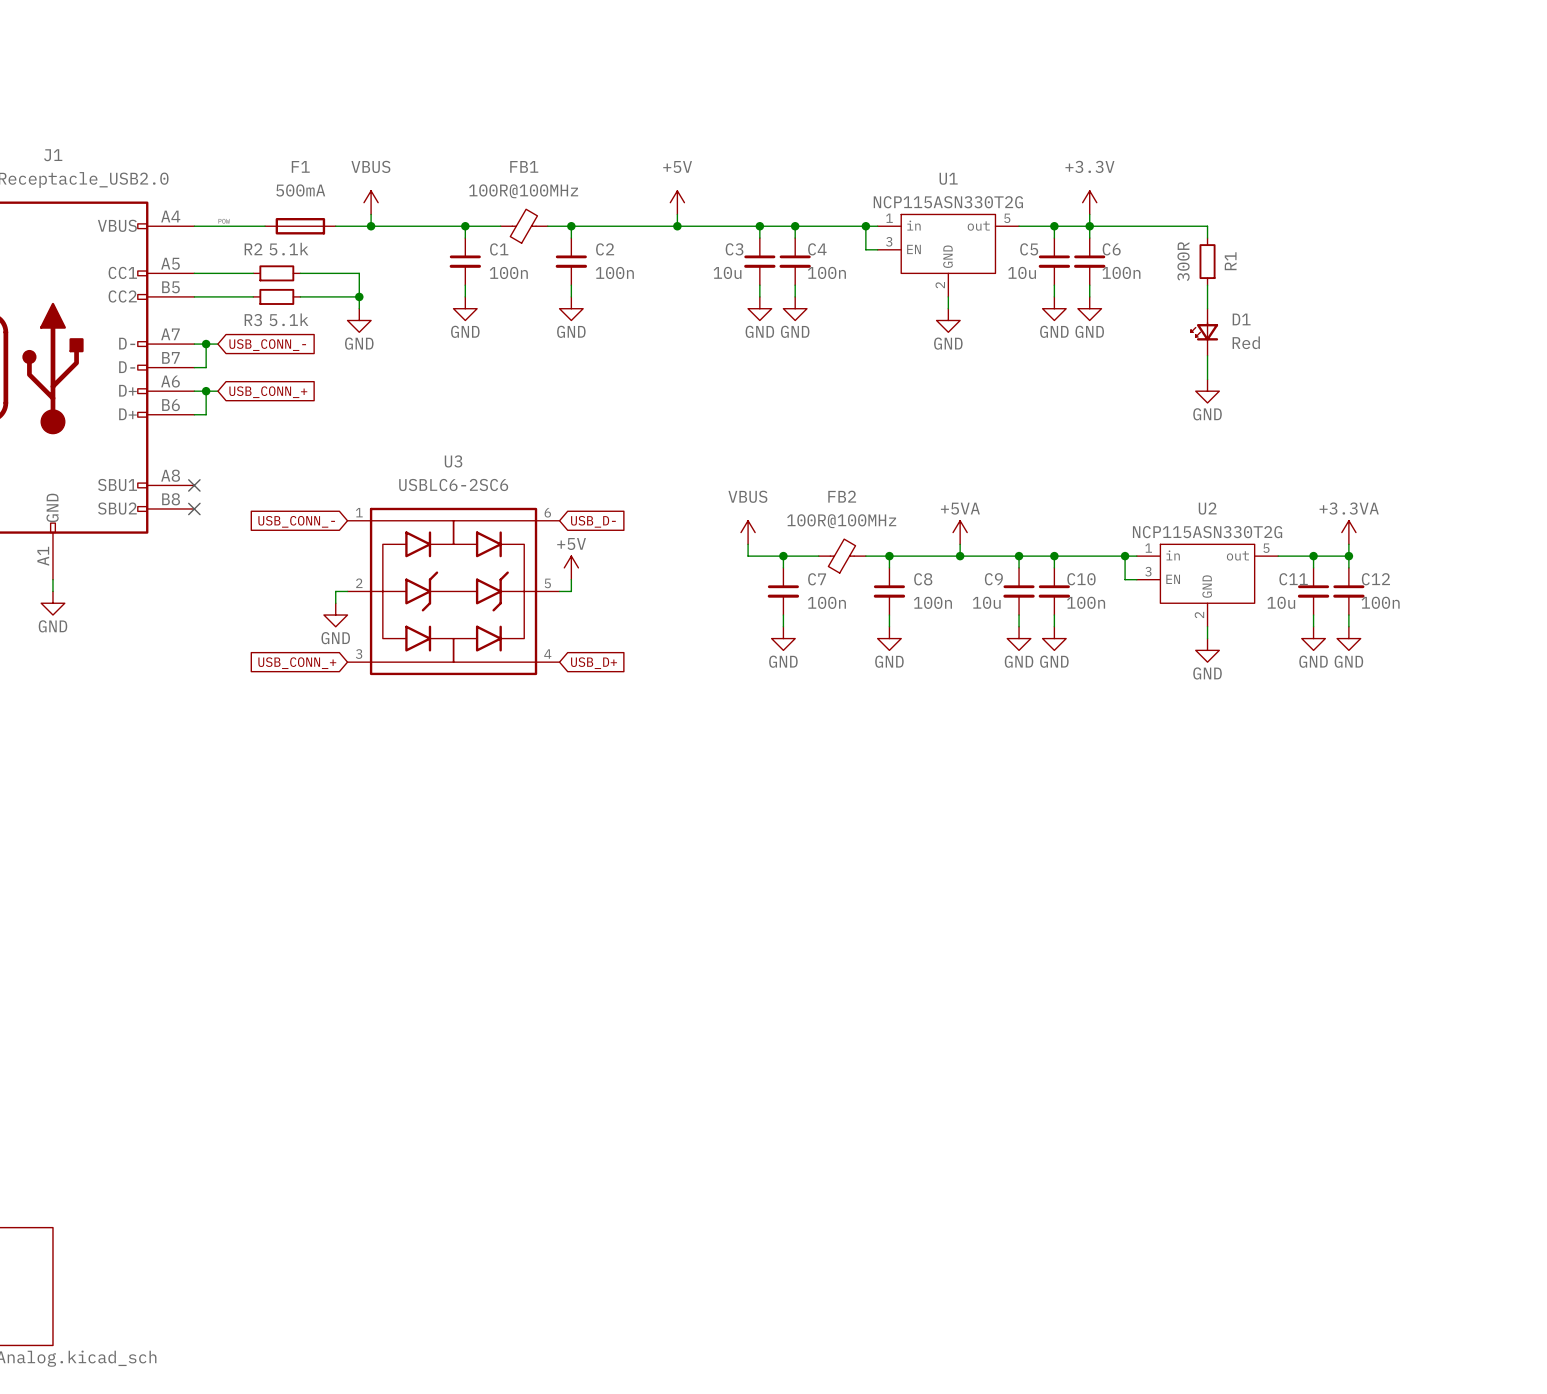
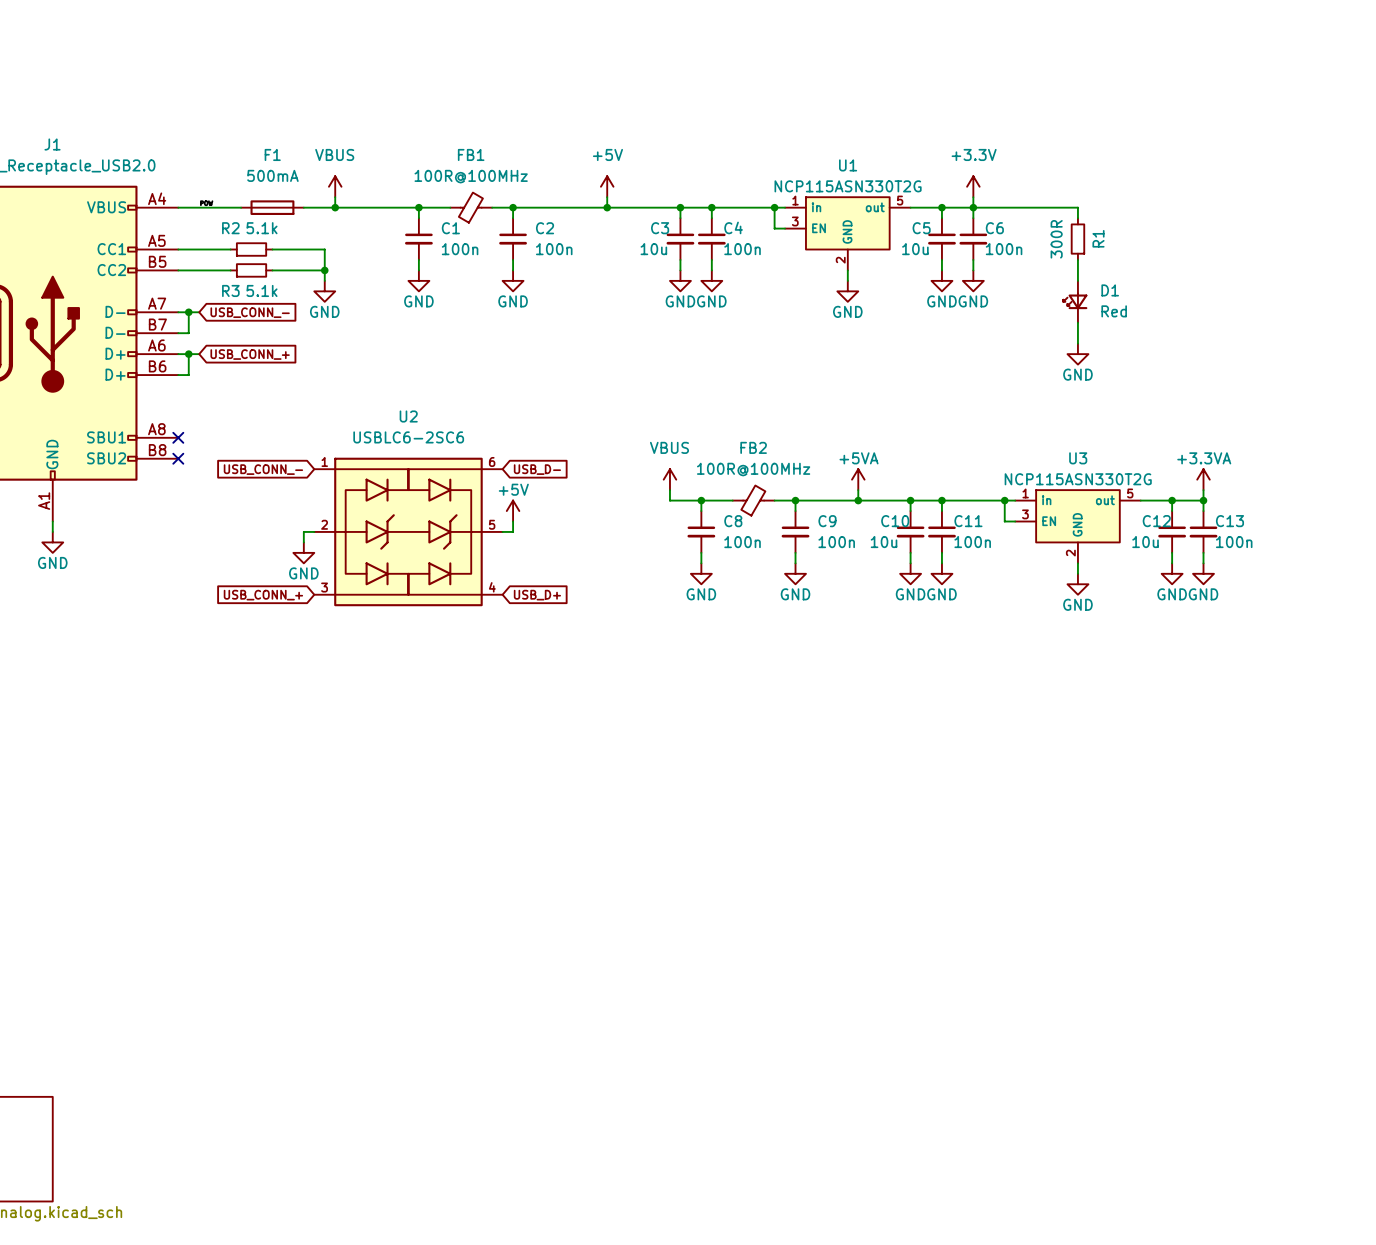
U3 name: U3 (453, 461) -> U2 (408, 416)
U2 name: U2 (1207, 508) -> U3 (1078, 458)
C7 name: C7 (817, 579) -> C8 (733, 521)
C8 name: C8 (923, 579) -> C9 (827, 521)
C9 name: C9 (993, 579) -> C10 (895, 521)
C10 name: C10 (1081, 579) -> C11 (968, 521)
C11 name: C11 (1293, 579) -> C12 (1156, 521)
C12 name: C12 (1375, 579) -> C13 (1229, 521)

